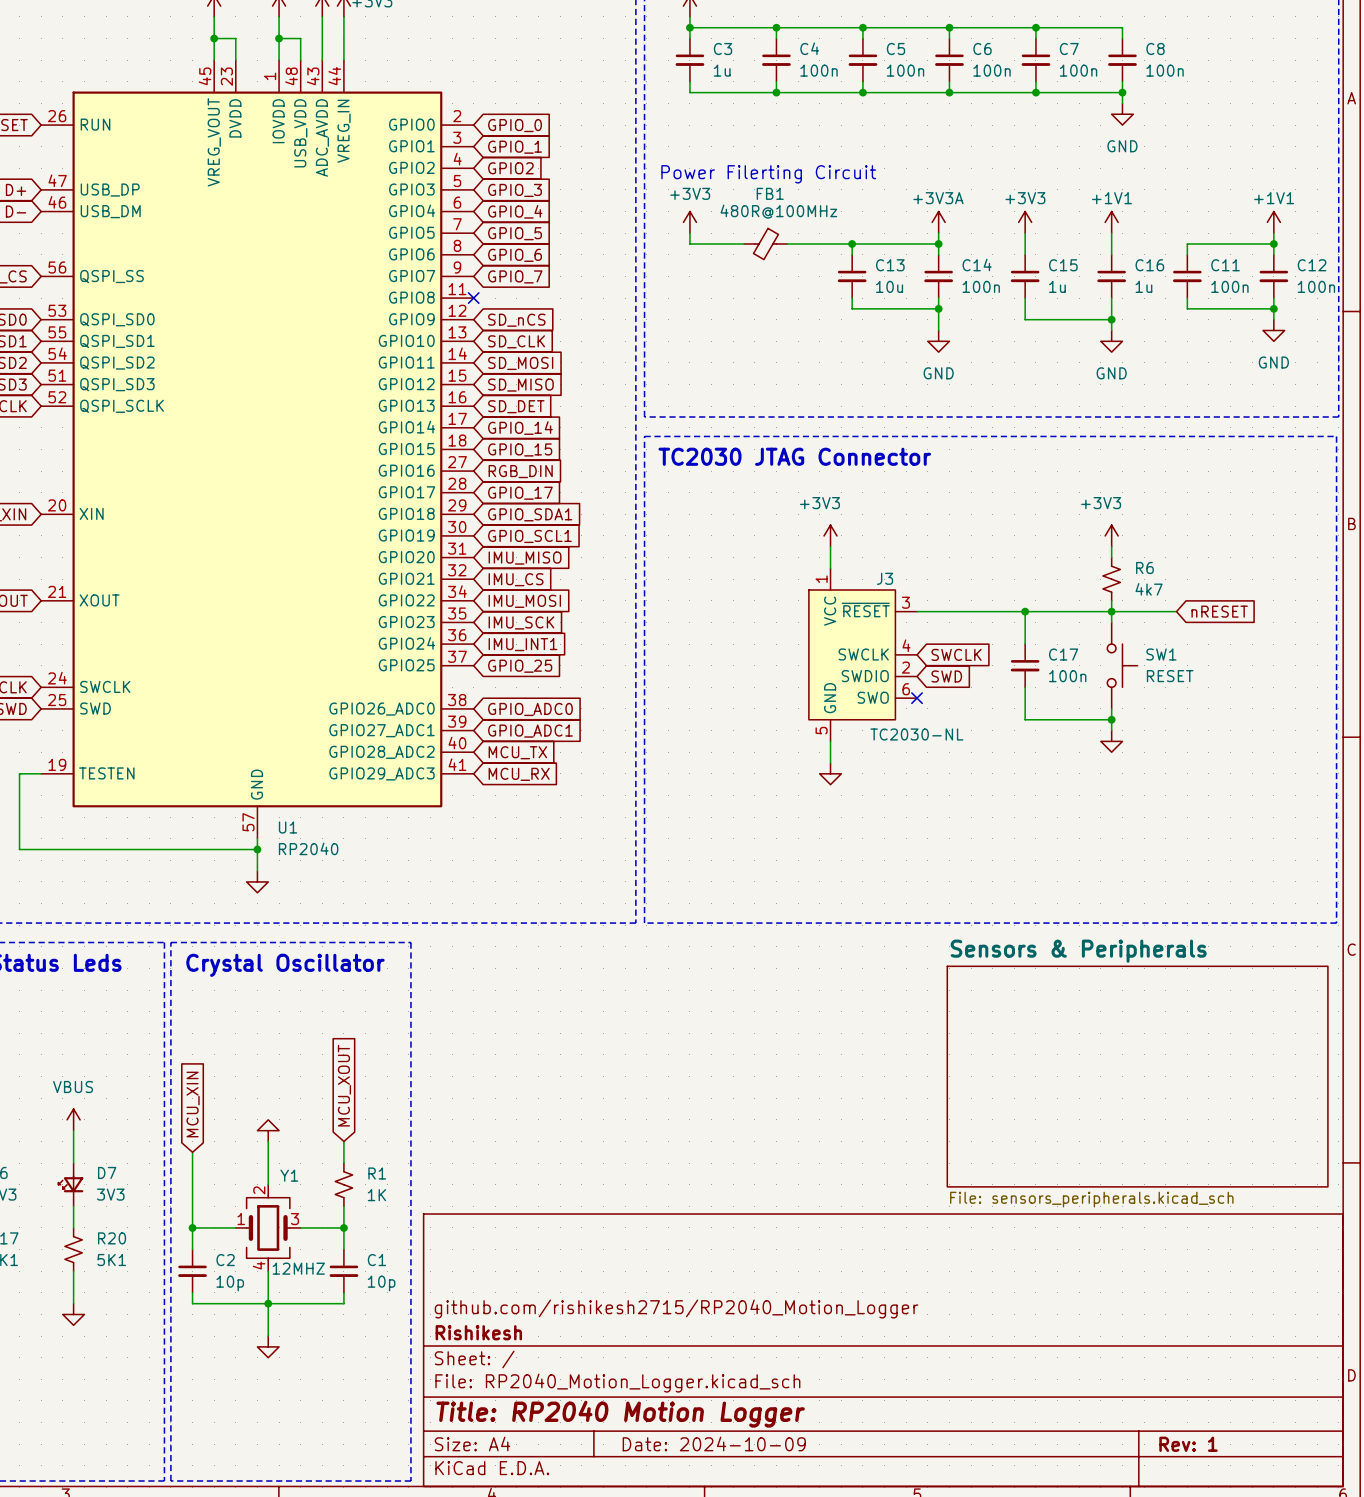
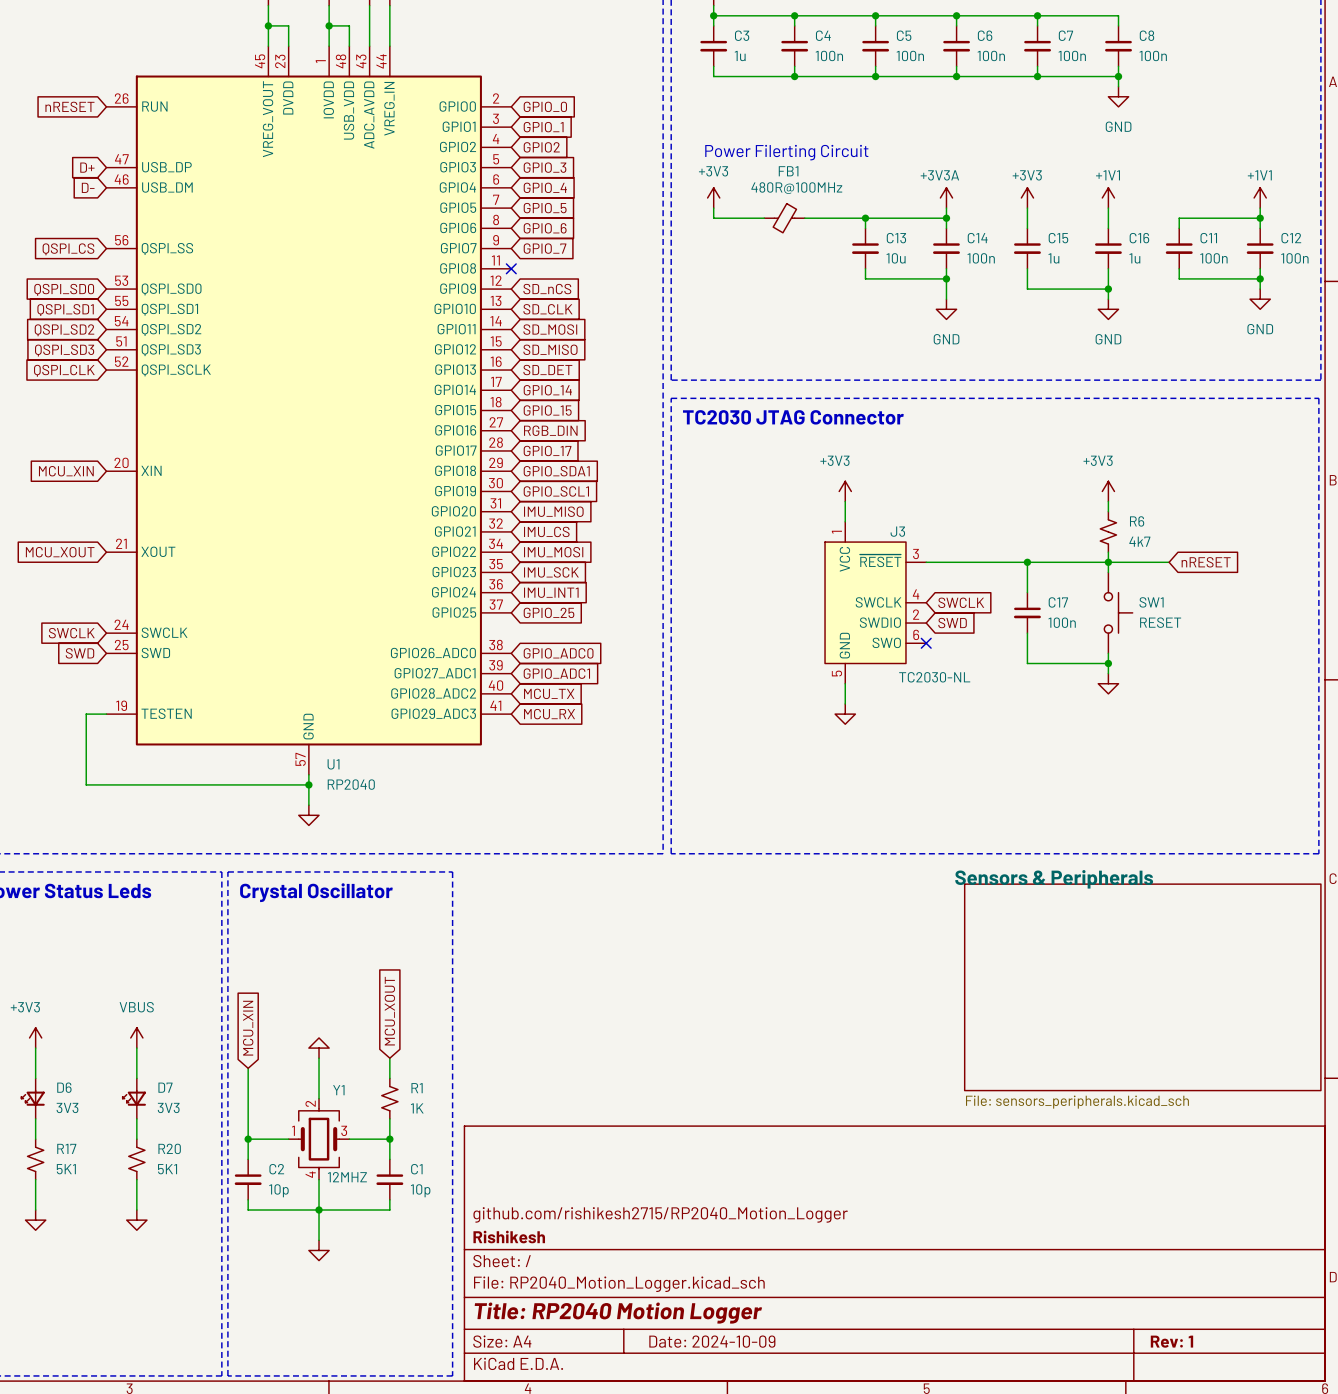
sheet Sensors & Peripherals position: (1137, 1076) -> (1142, 987)

